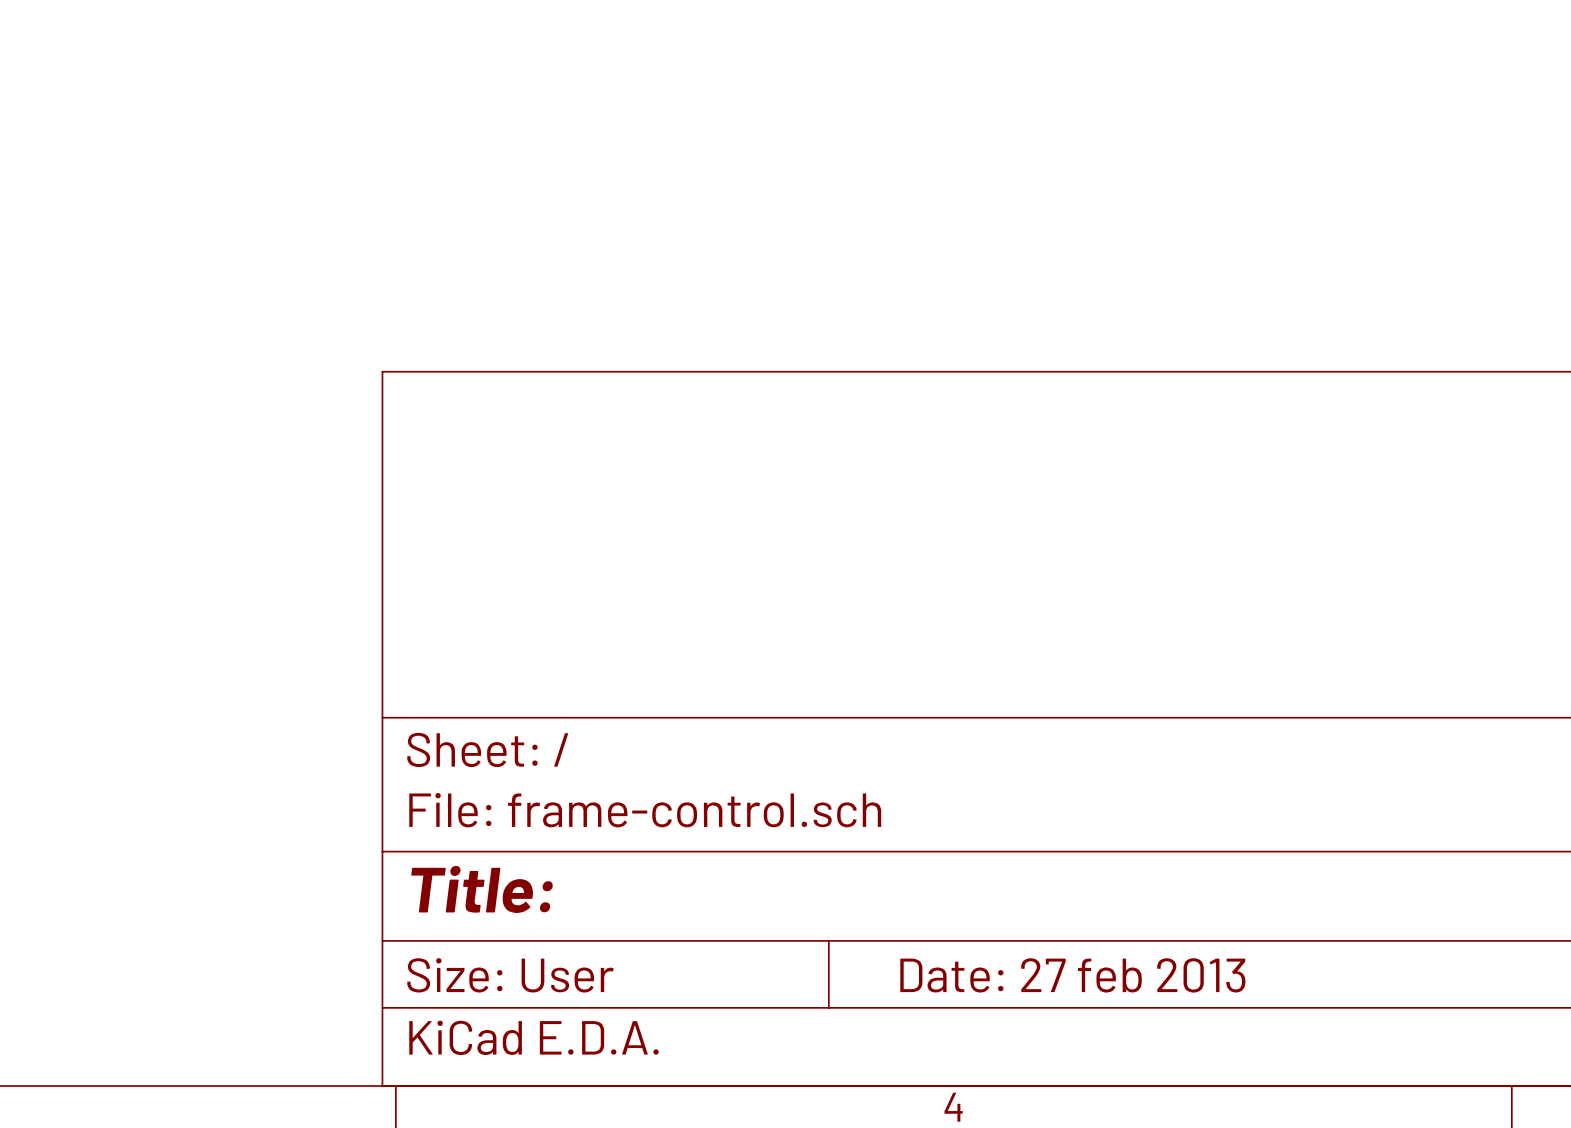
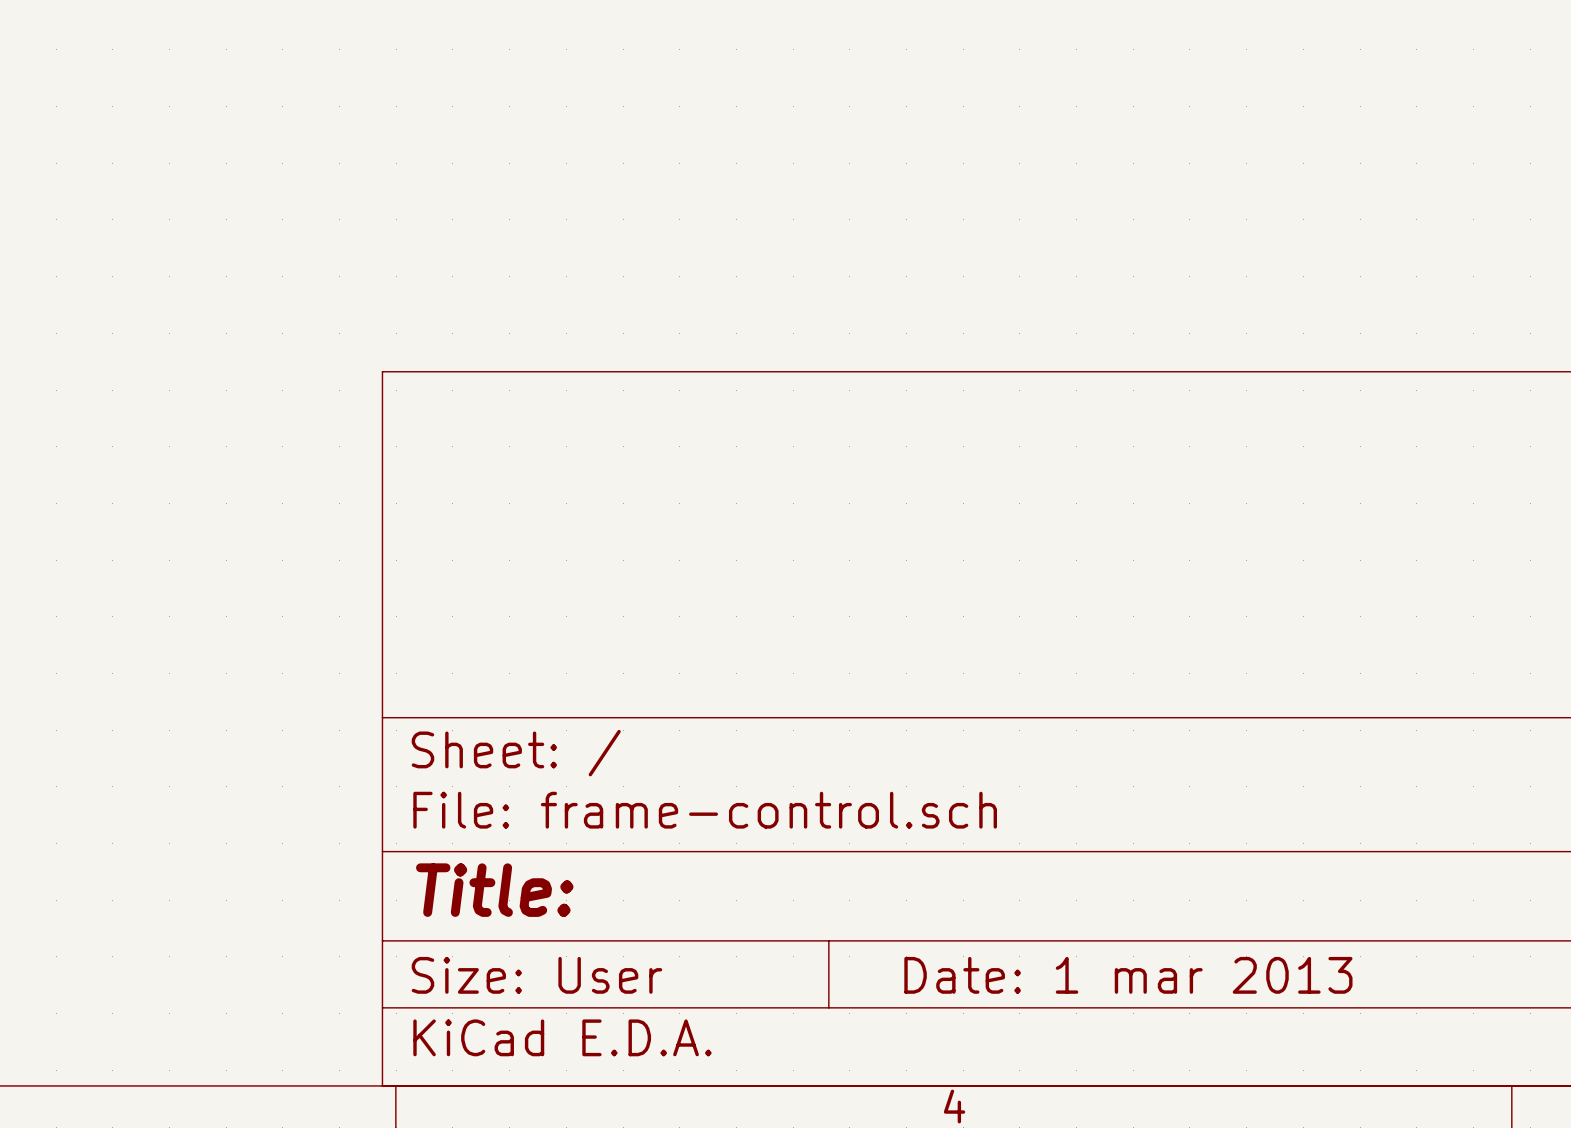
title block: Date: 27 feb 2013 (1072, 975) -> Date: 1 mar 2013 (1128, 975)

